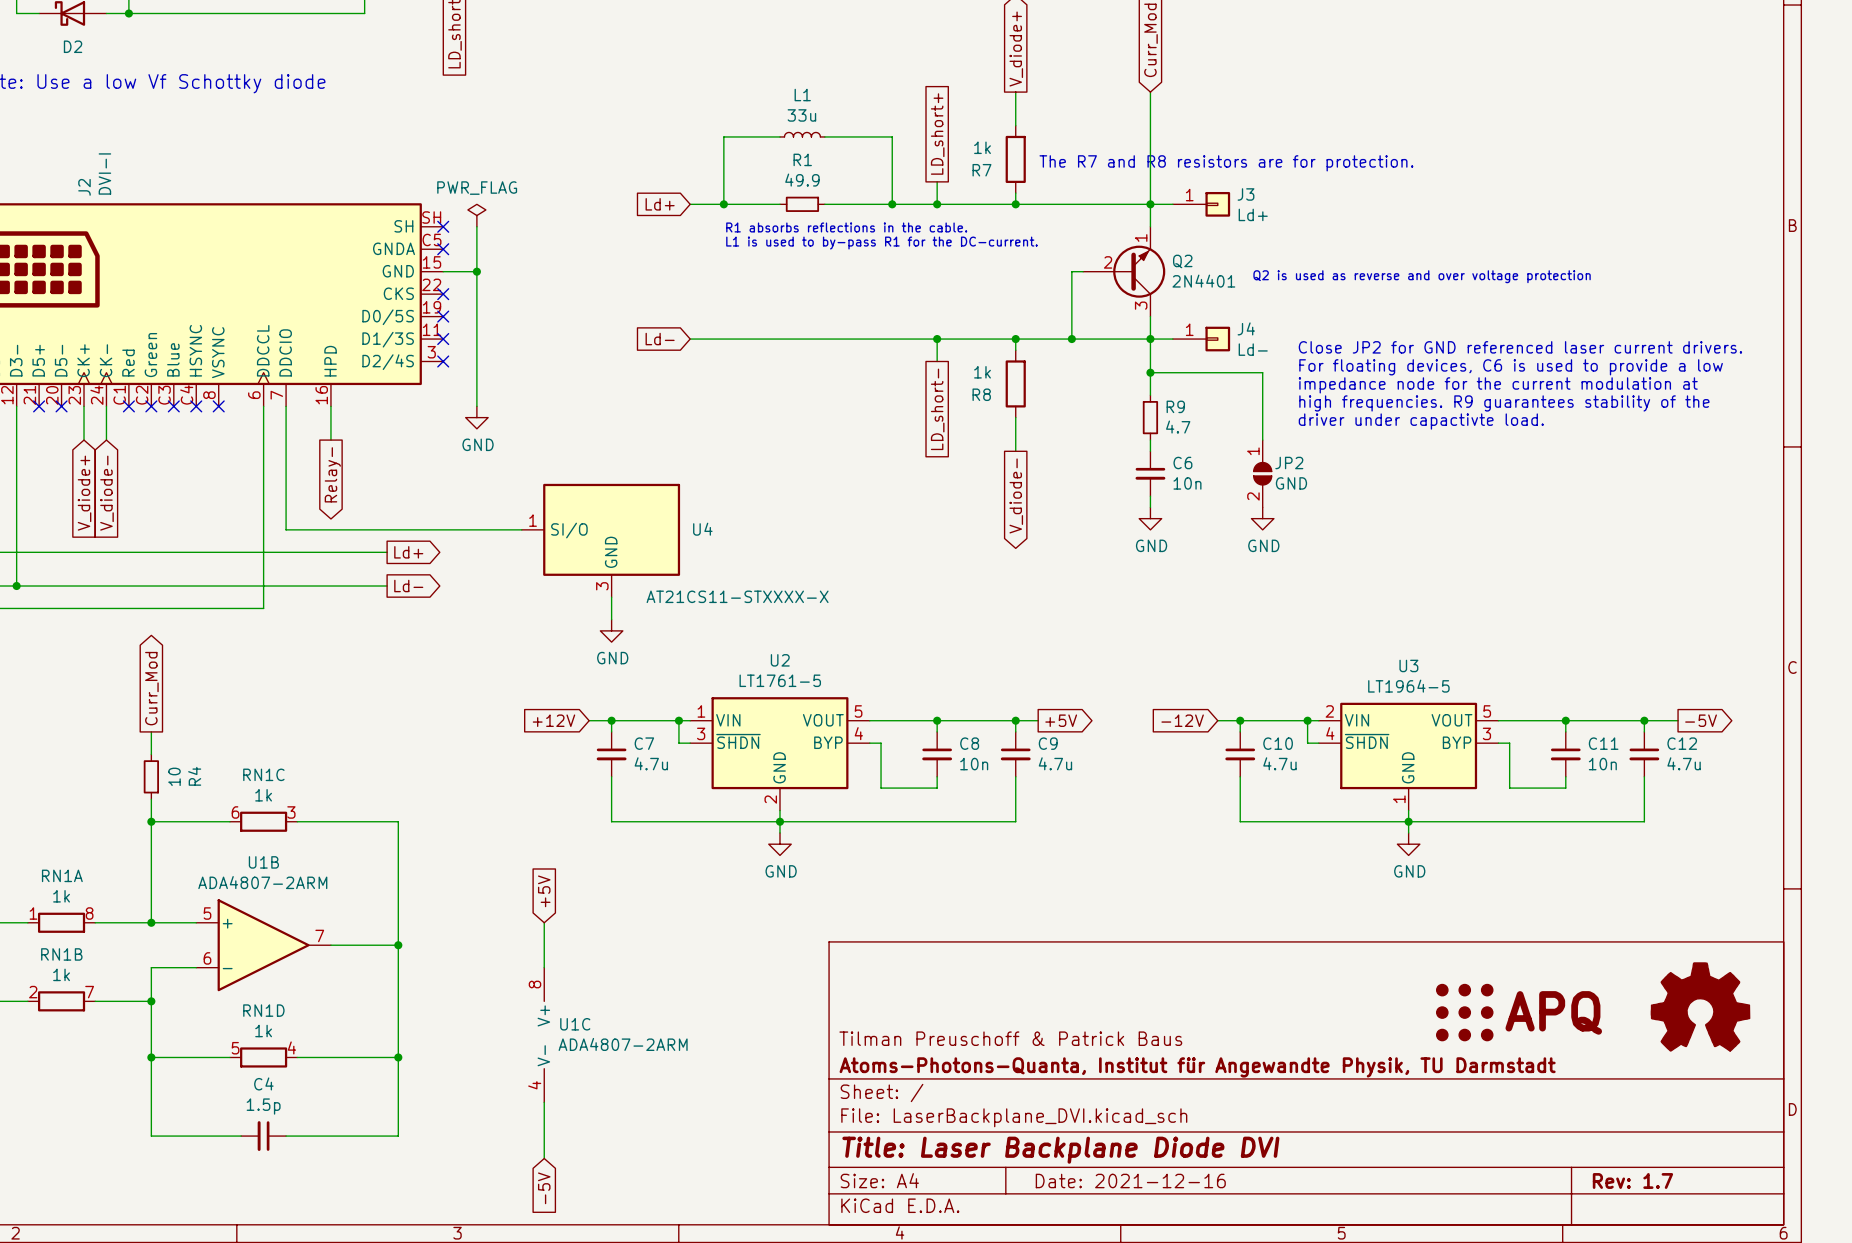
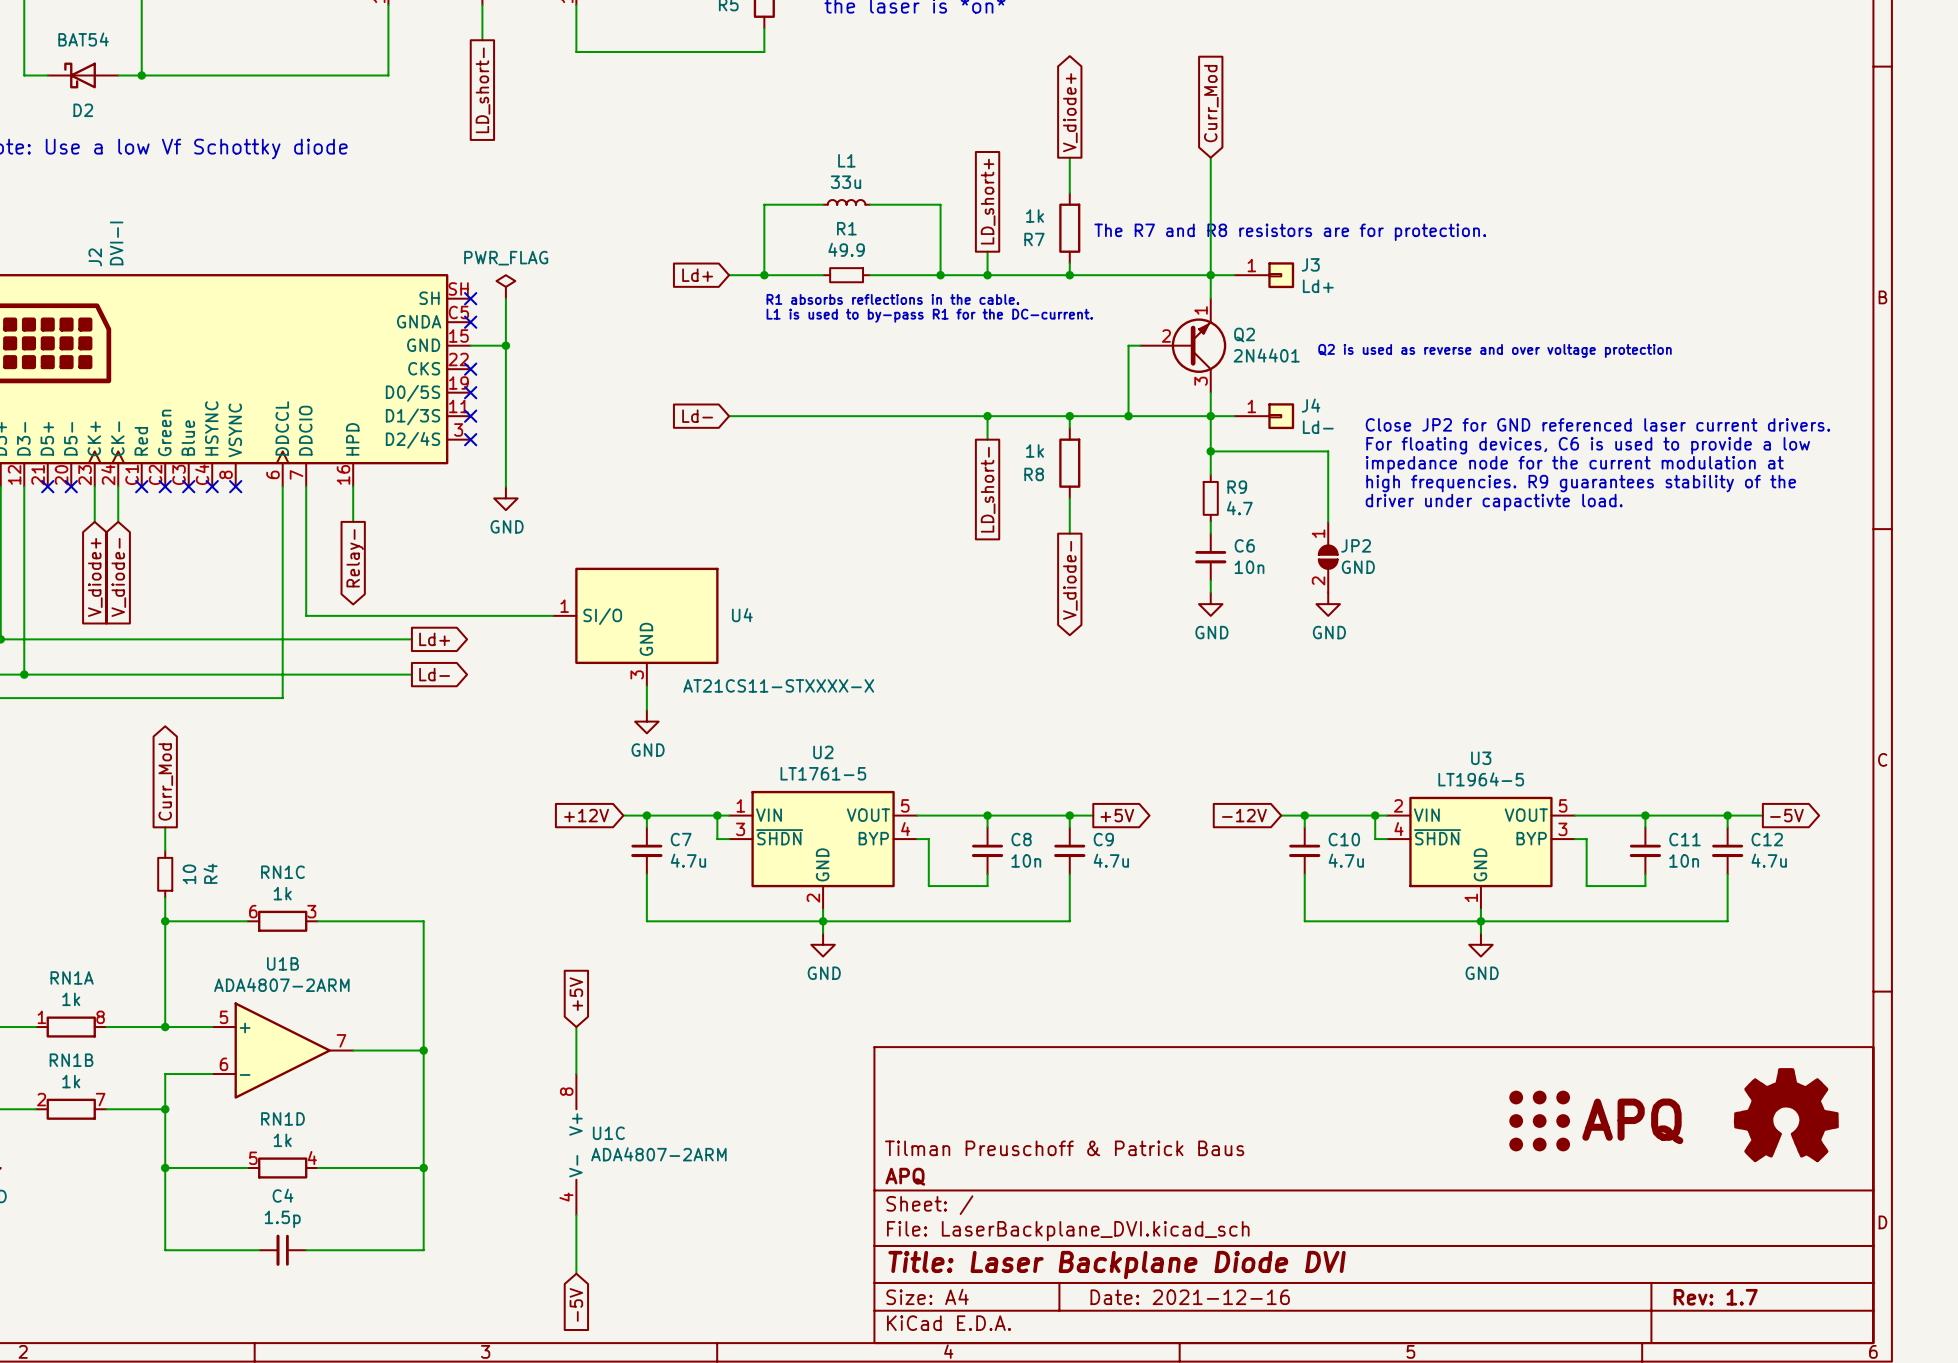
title block: Atoms-Photons-Quanta, Institut für Angewandte Physik, TU Darmstadt (1197, 1067) -> APQ (905, 1176)

